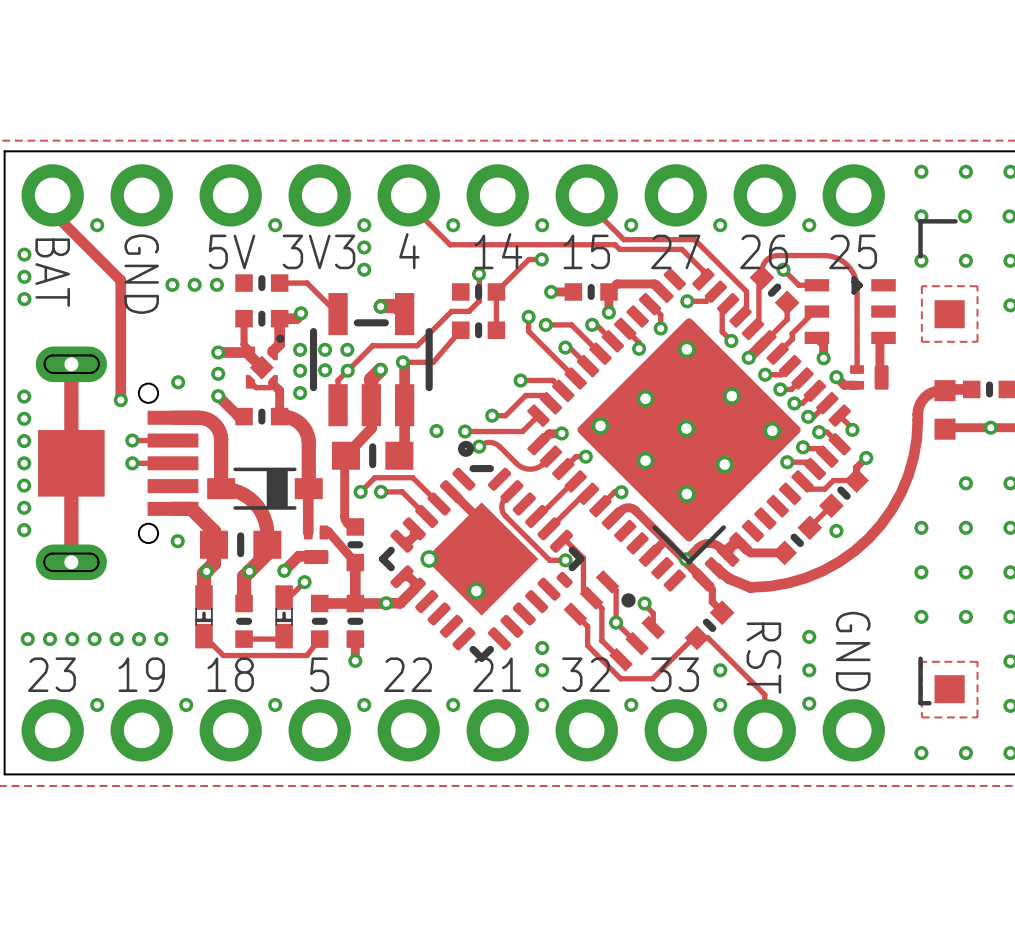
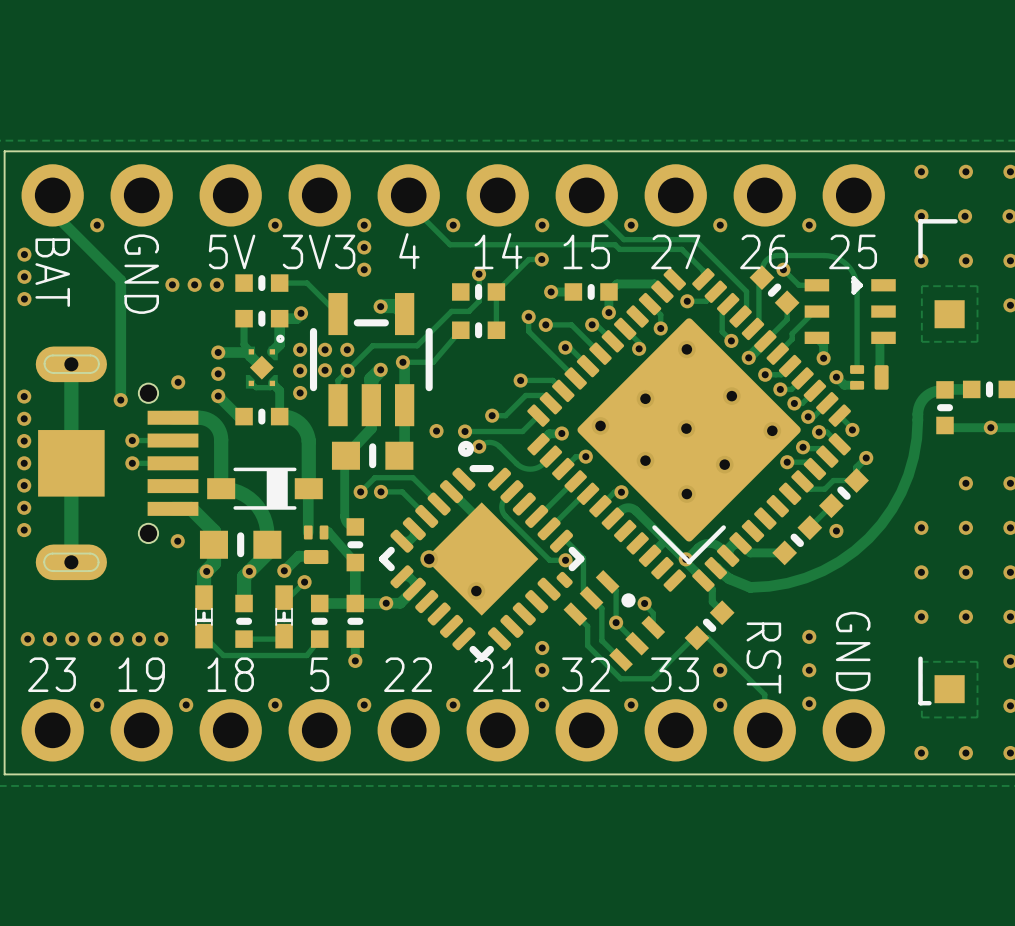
part footprint: [934, 380, 956, 440] -> [936, 381, 954, 435]

